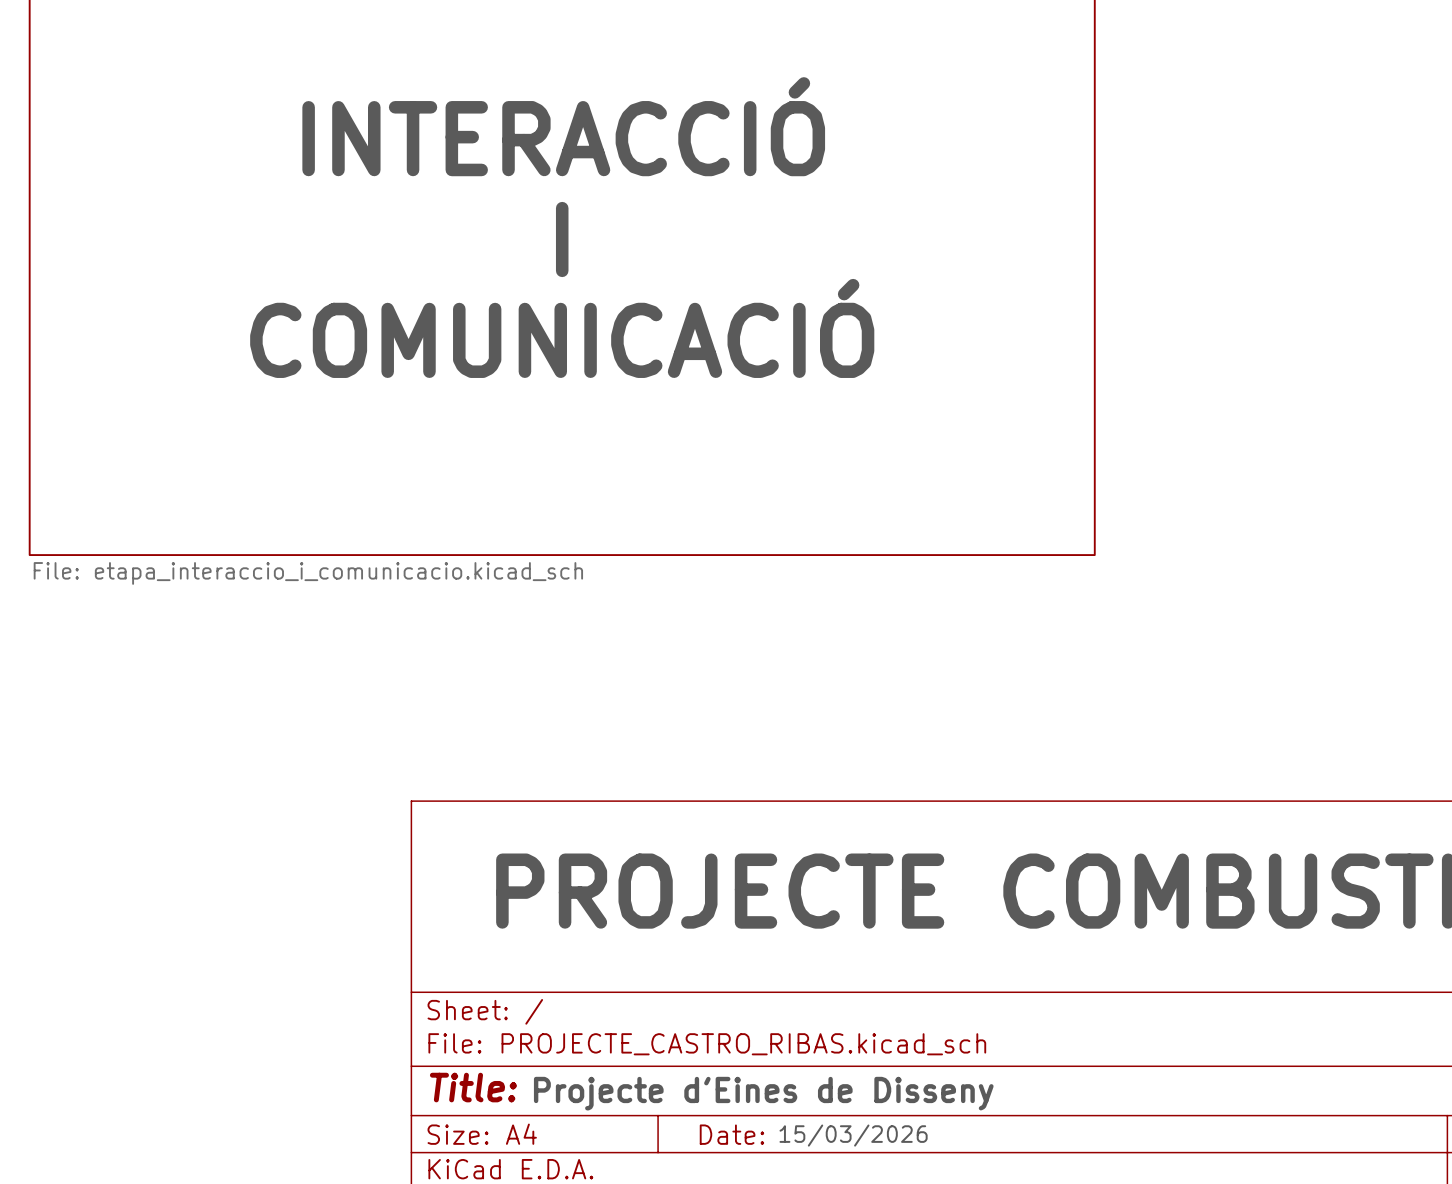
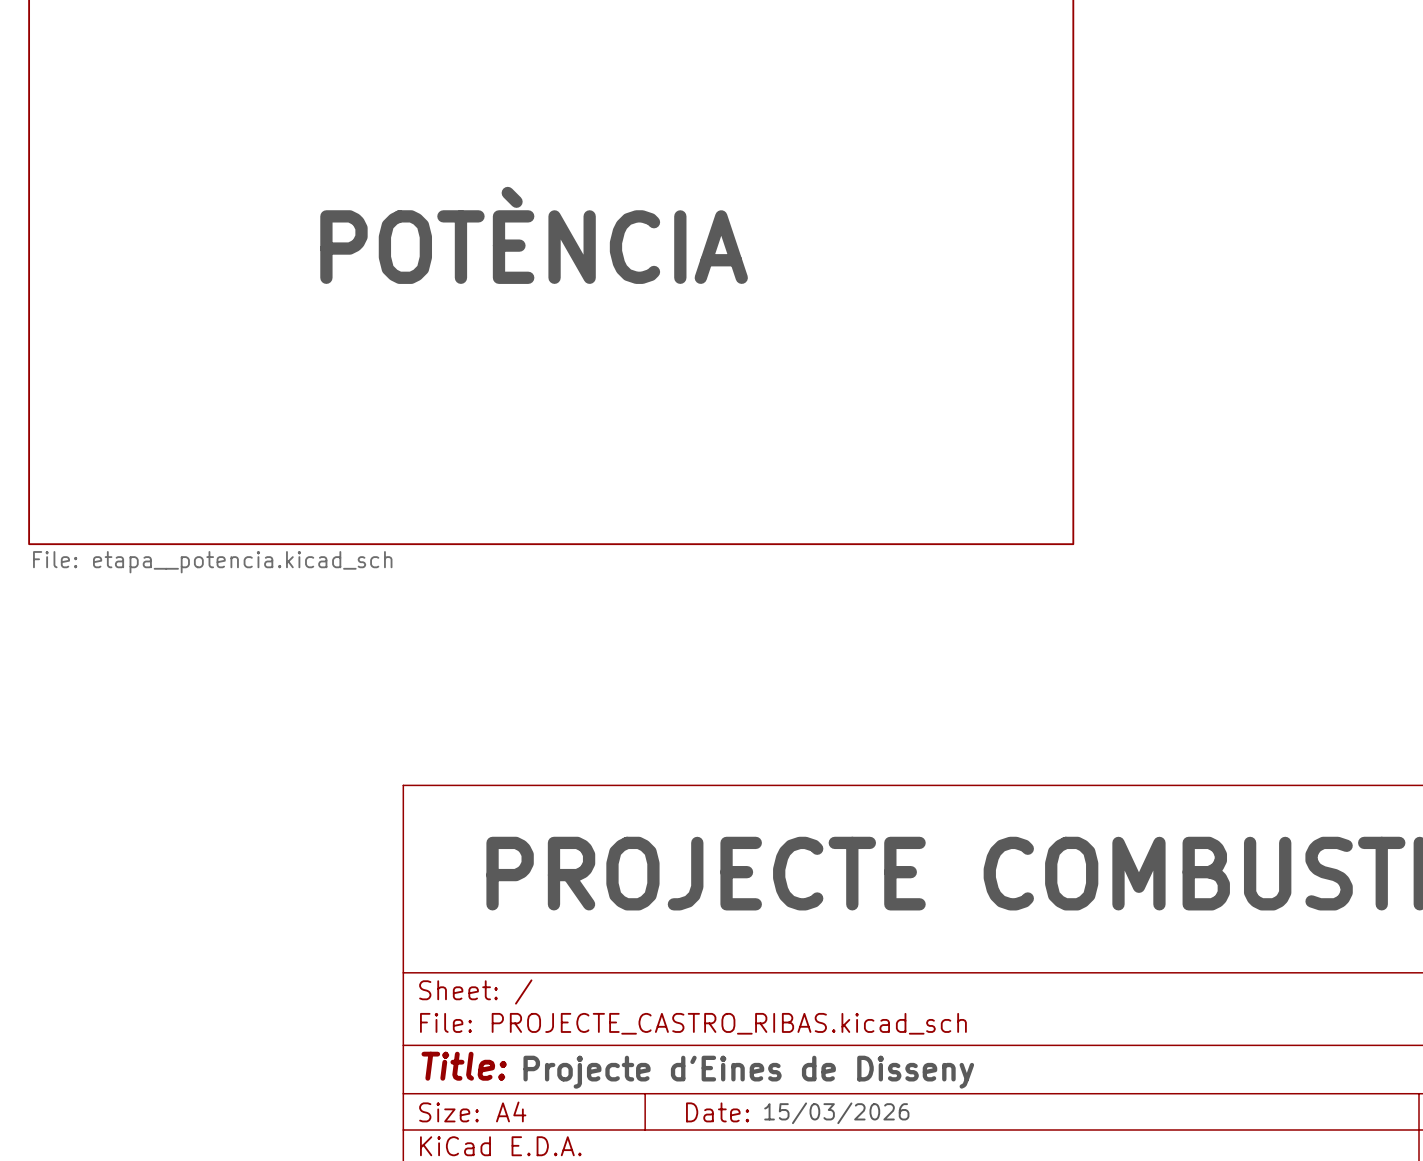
text: INTERACCIÓ (563, 126) -> none
text: I (562, 239) -> none
text: none -> POTÈNCIA (534, 235)
text: COMUNICACIÓ (562, 328) -> none
sheet value: File: etapa_interaccio_i_comunicacio.kicad_sch (308, 573) -> File: etapa__potencia.kicad_sch (212, 562)

